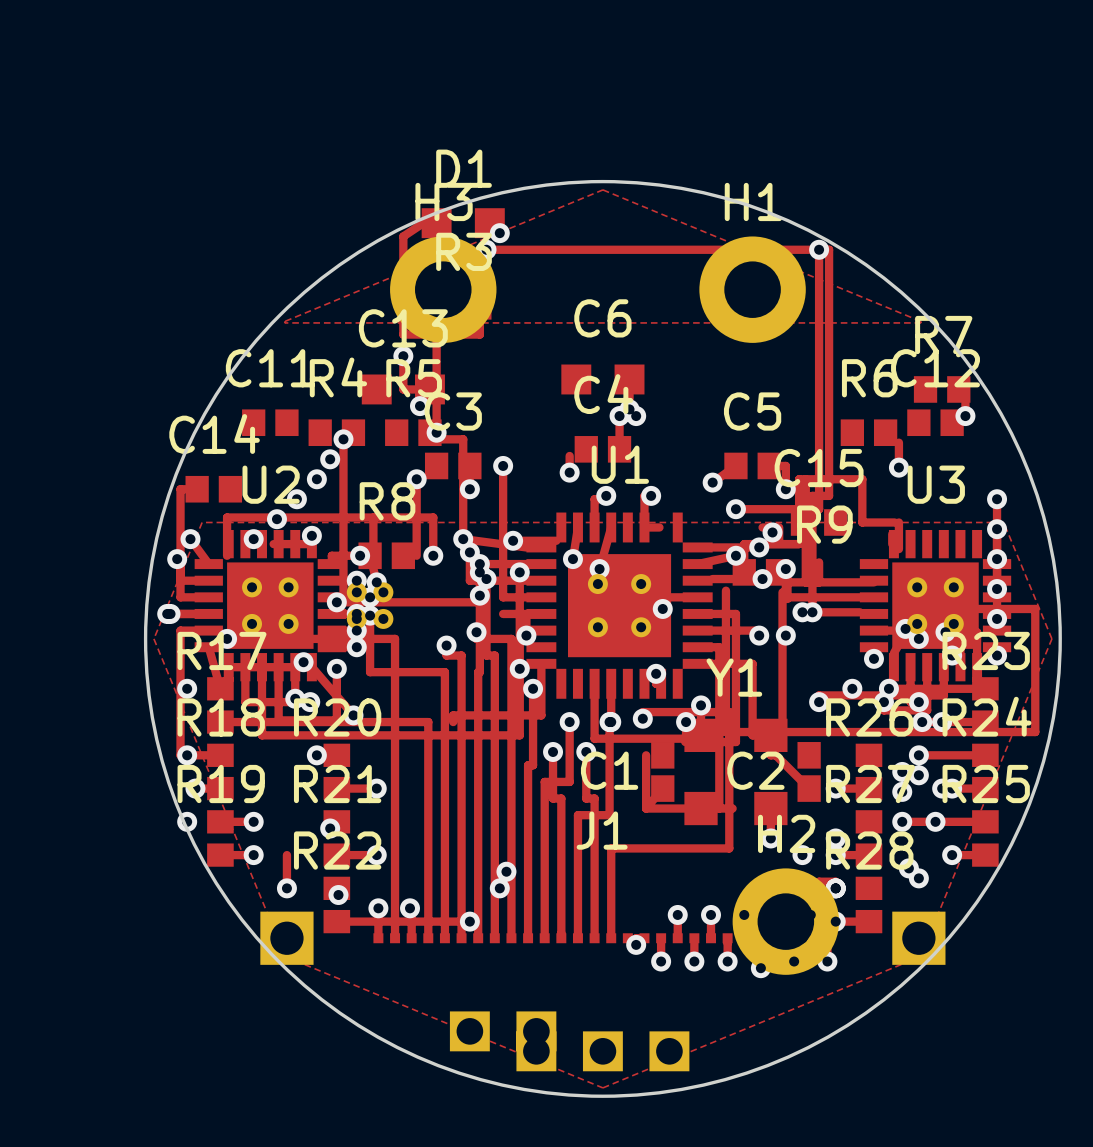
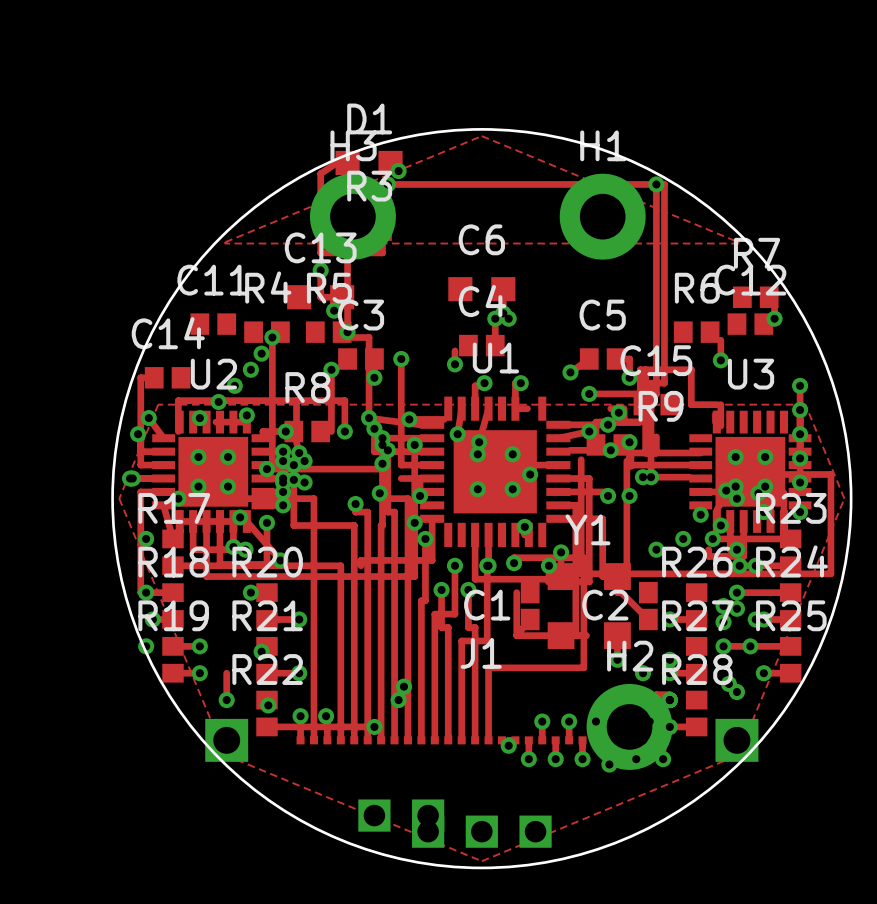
track: (943, 681) (943, 695) (819, 695) (819, 702) -> none
via position: (883, 702) -> (720, 525)

